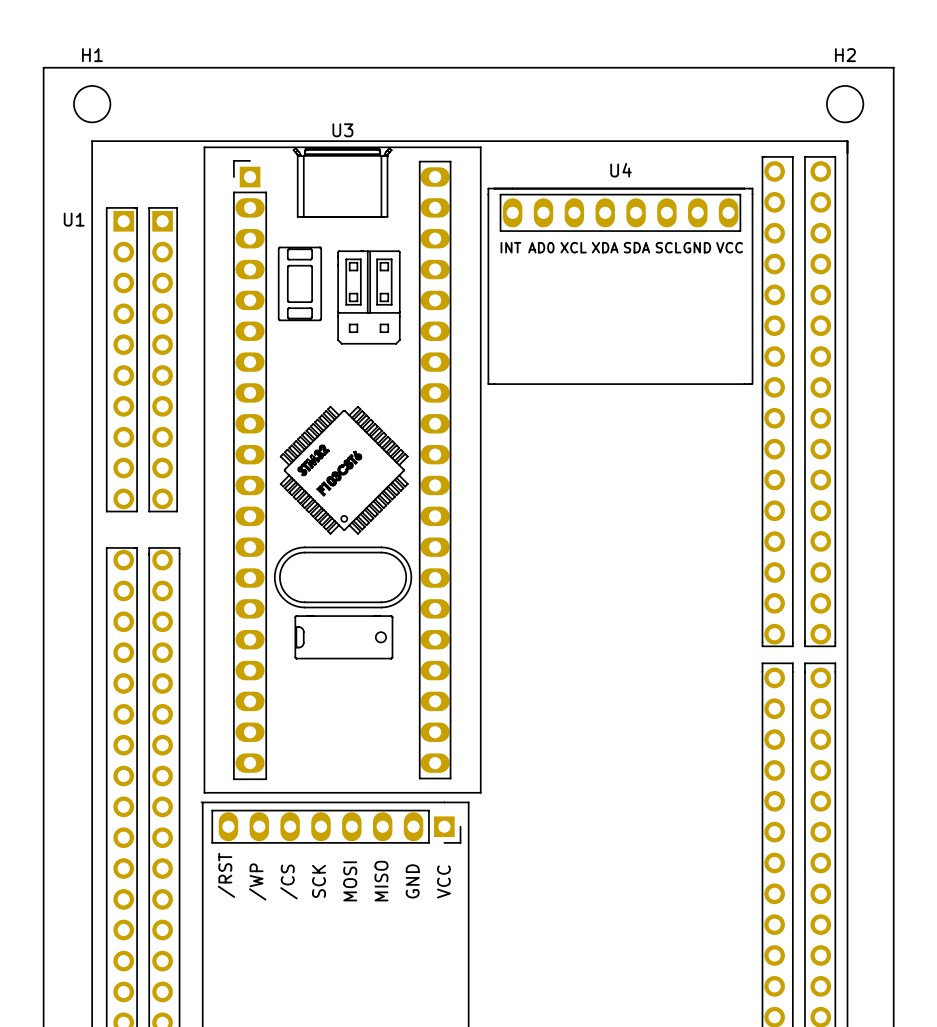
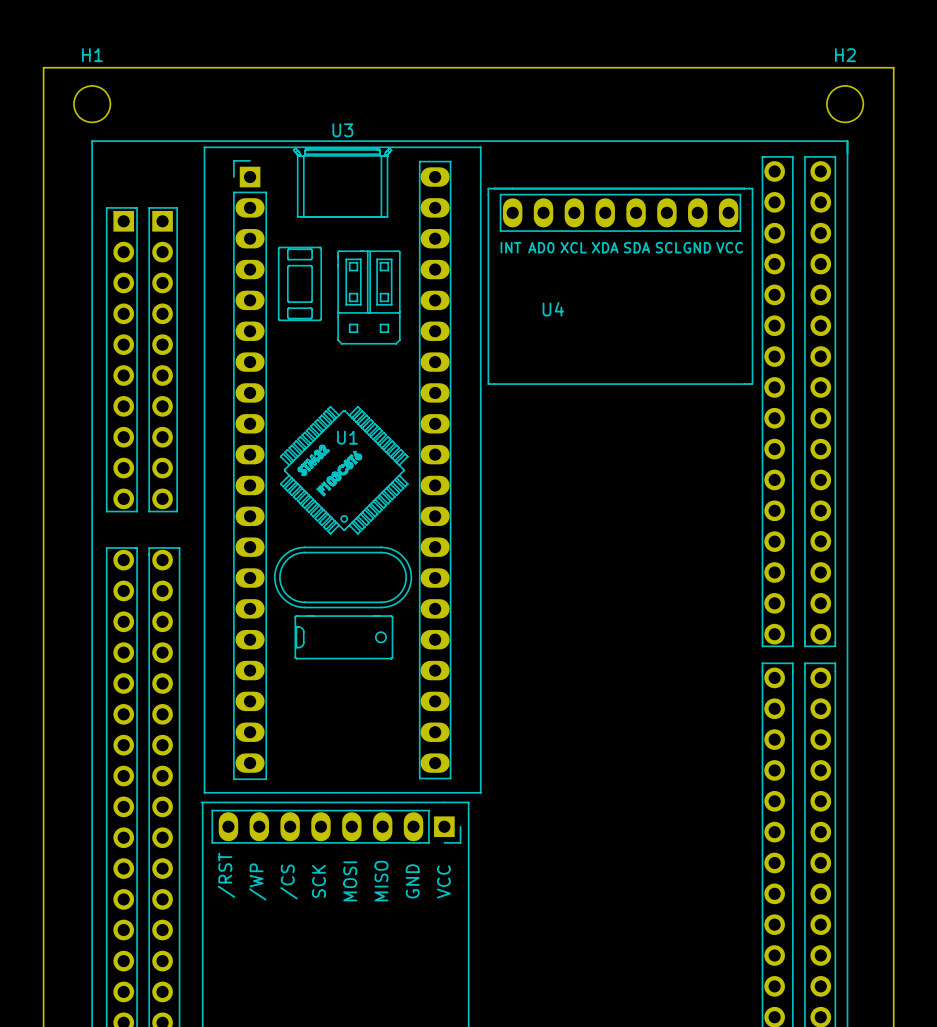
U4 name position: U4 (621, 170) -> U4 (553, 309)
U1 name position: U1 (74, 219) -> U1 (347, 437)

